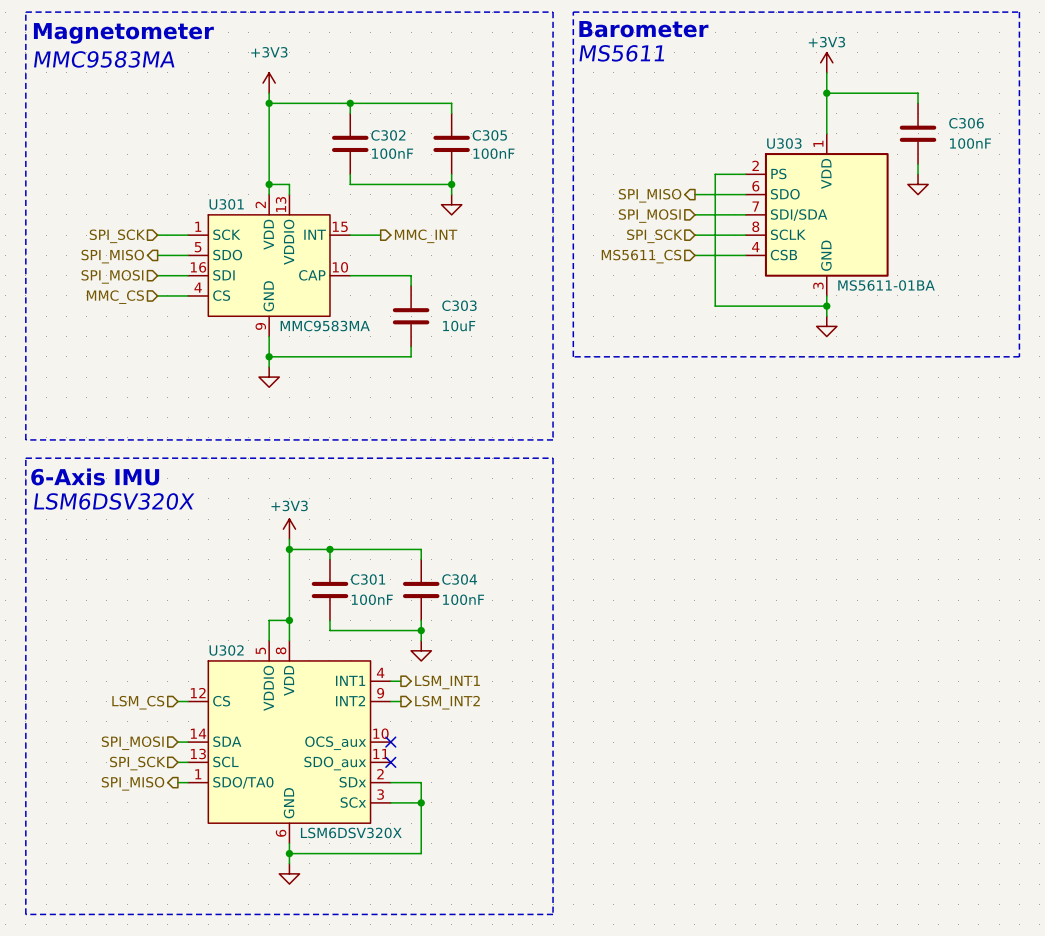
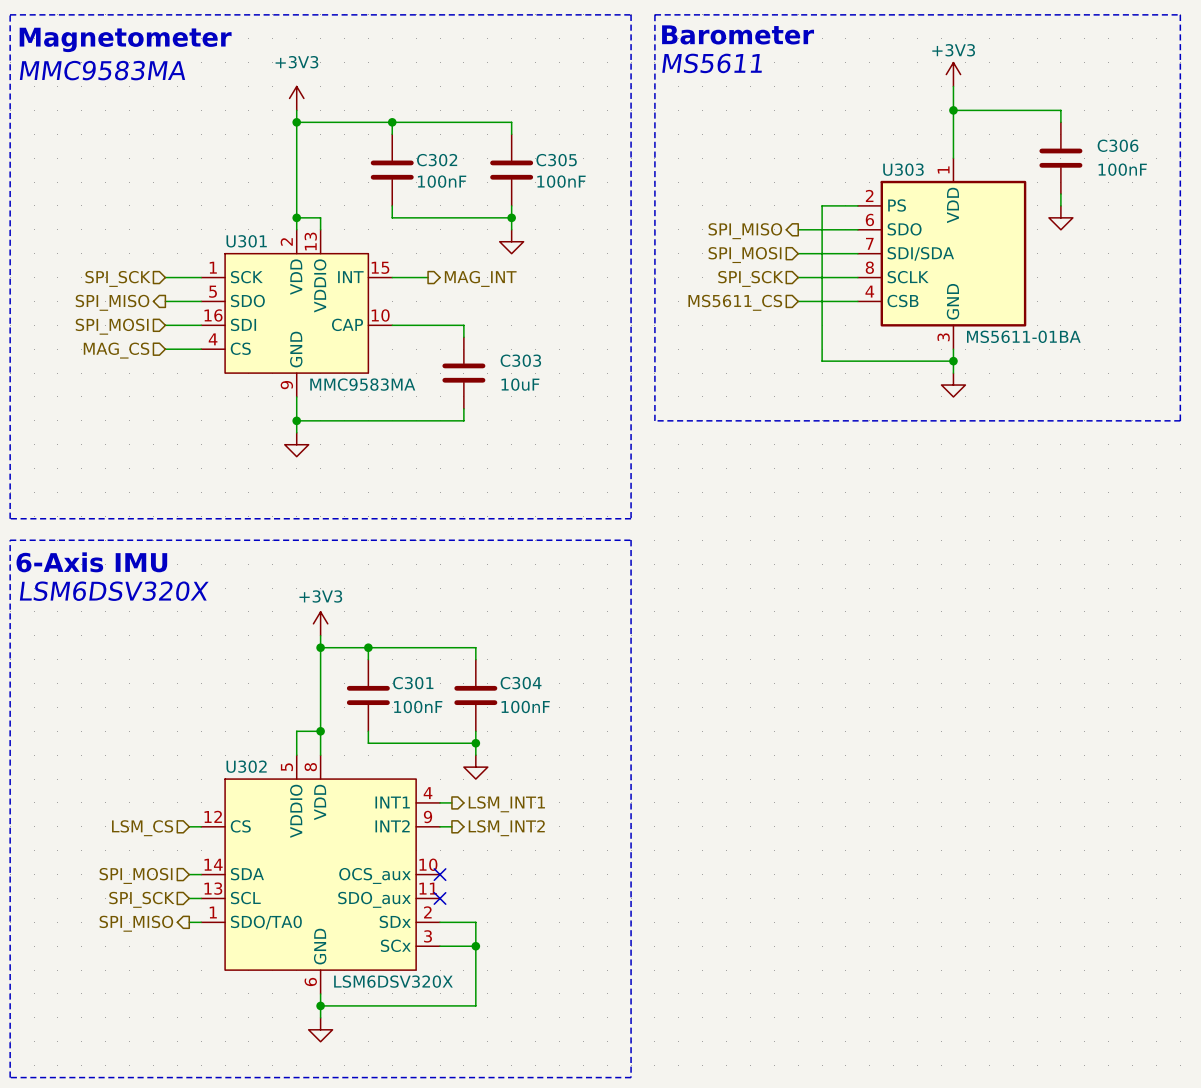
hierarchical label: MMC_INT (426, 236) -> MAG_INT (480, 278)
hierarchical label: MMC_CS (115, 297) -> MAG_CS (116, 350)

